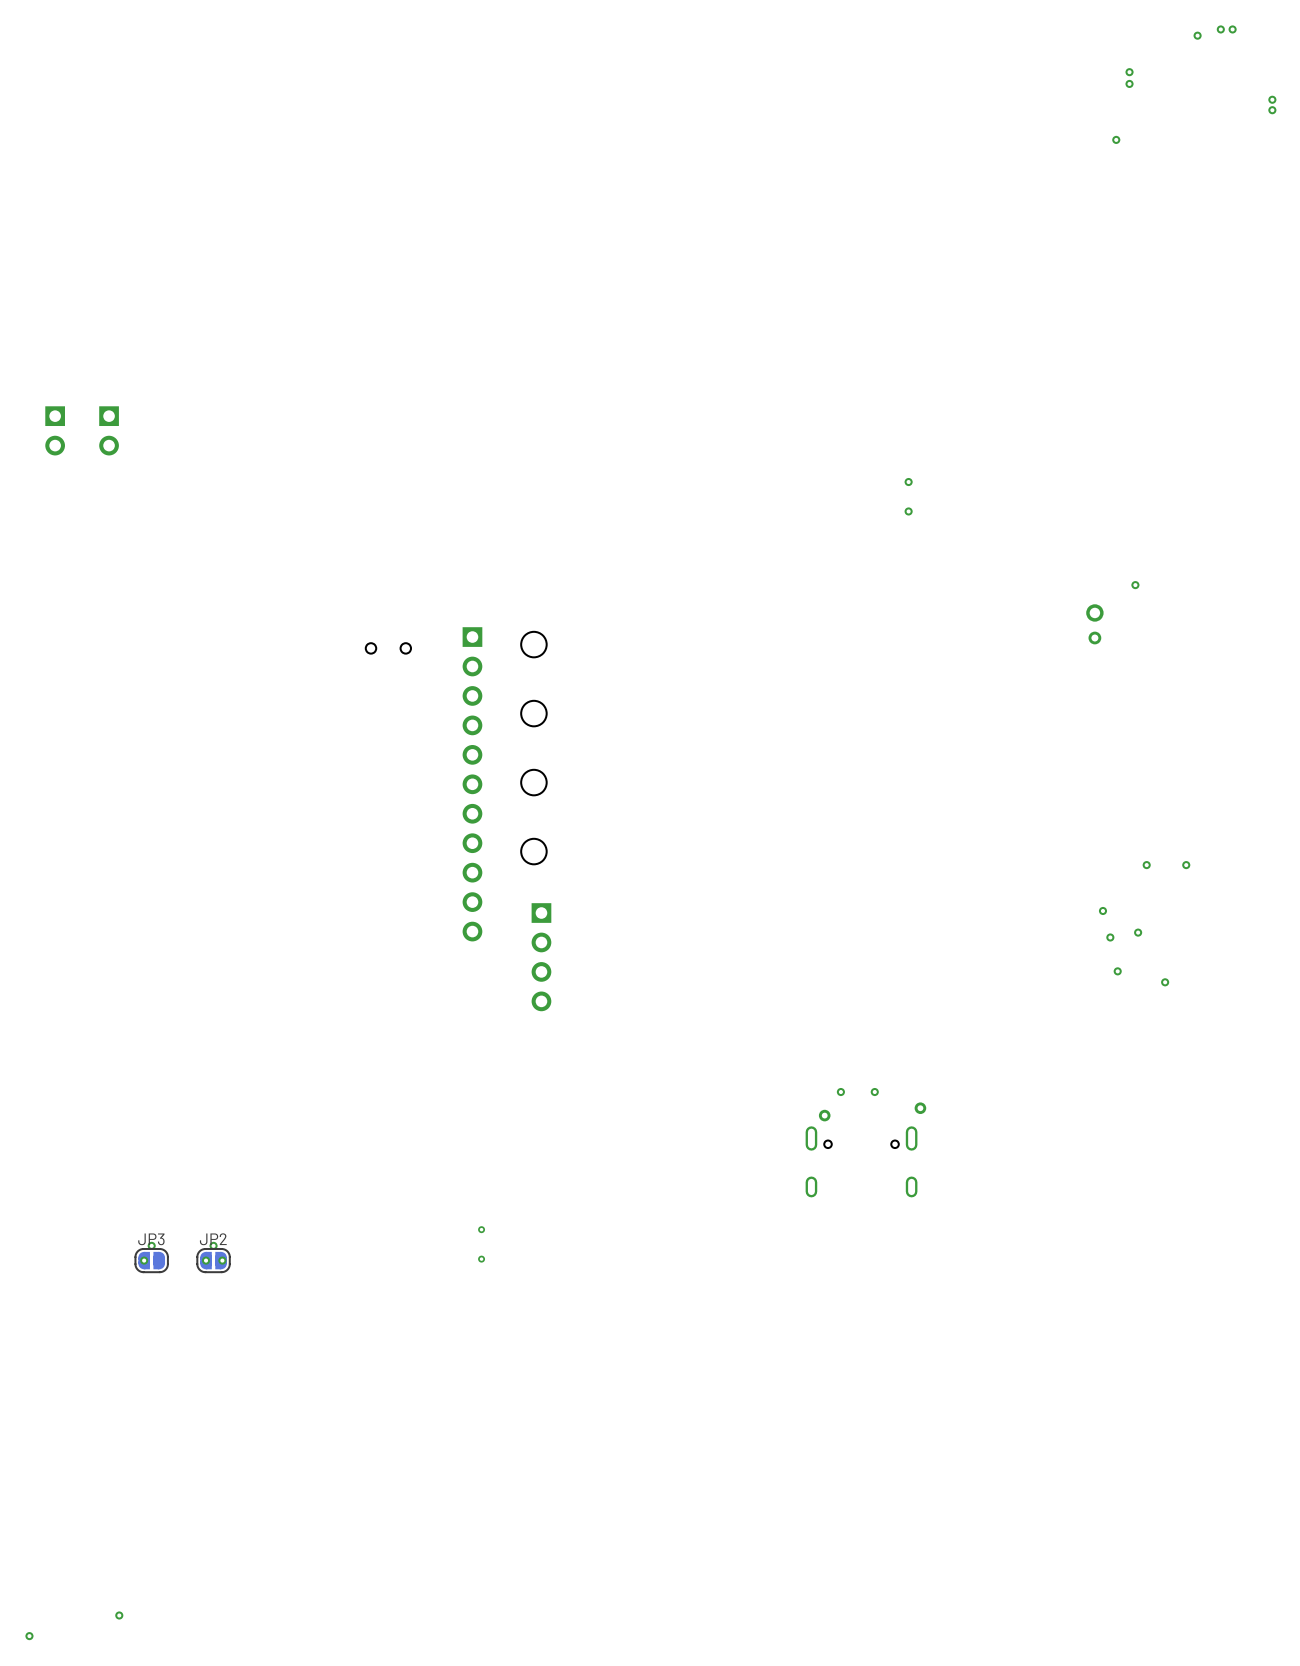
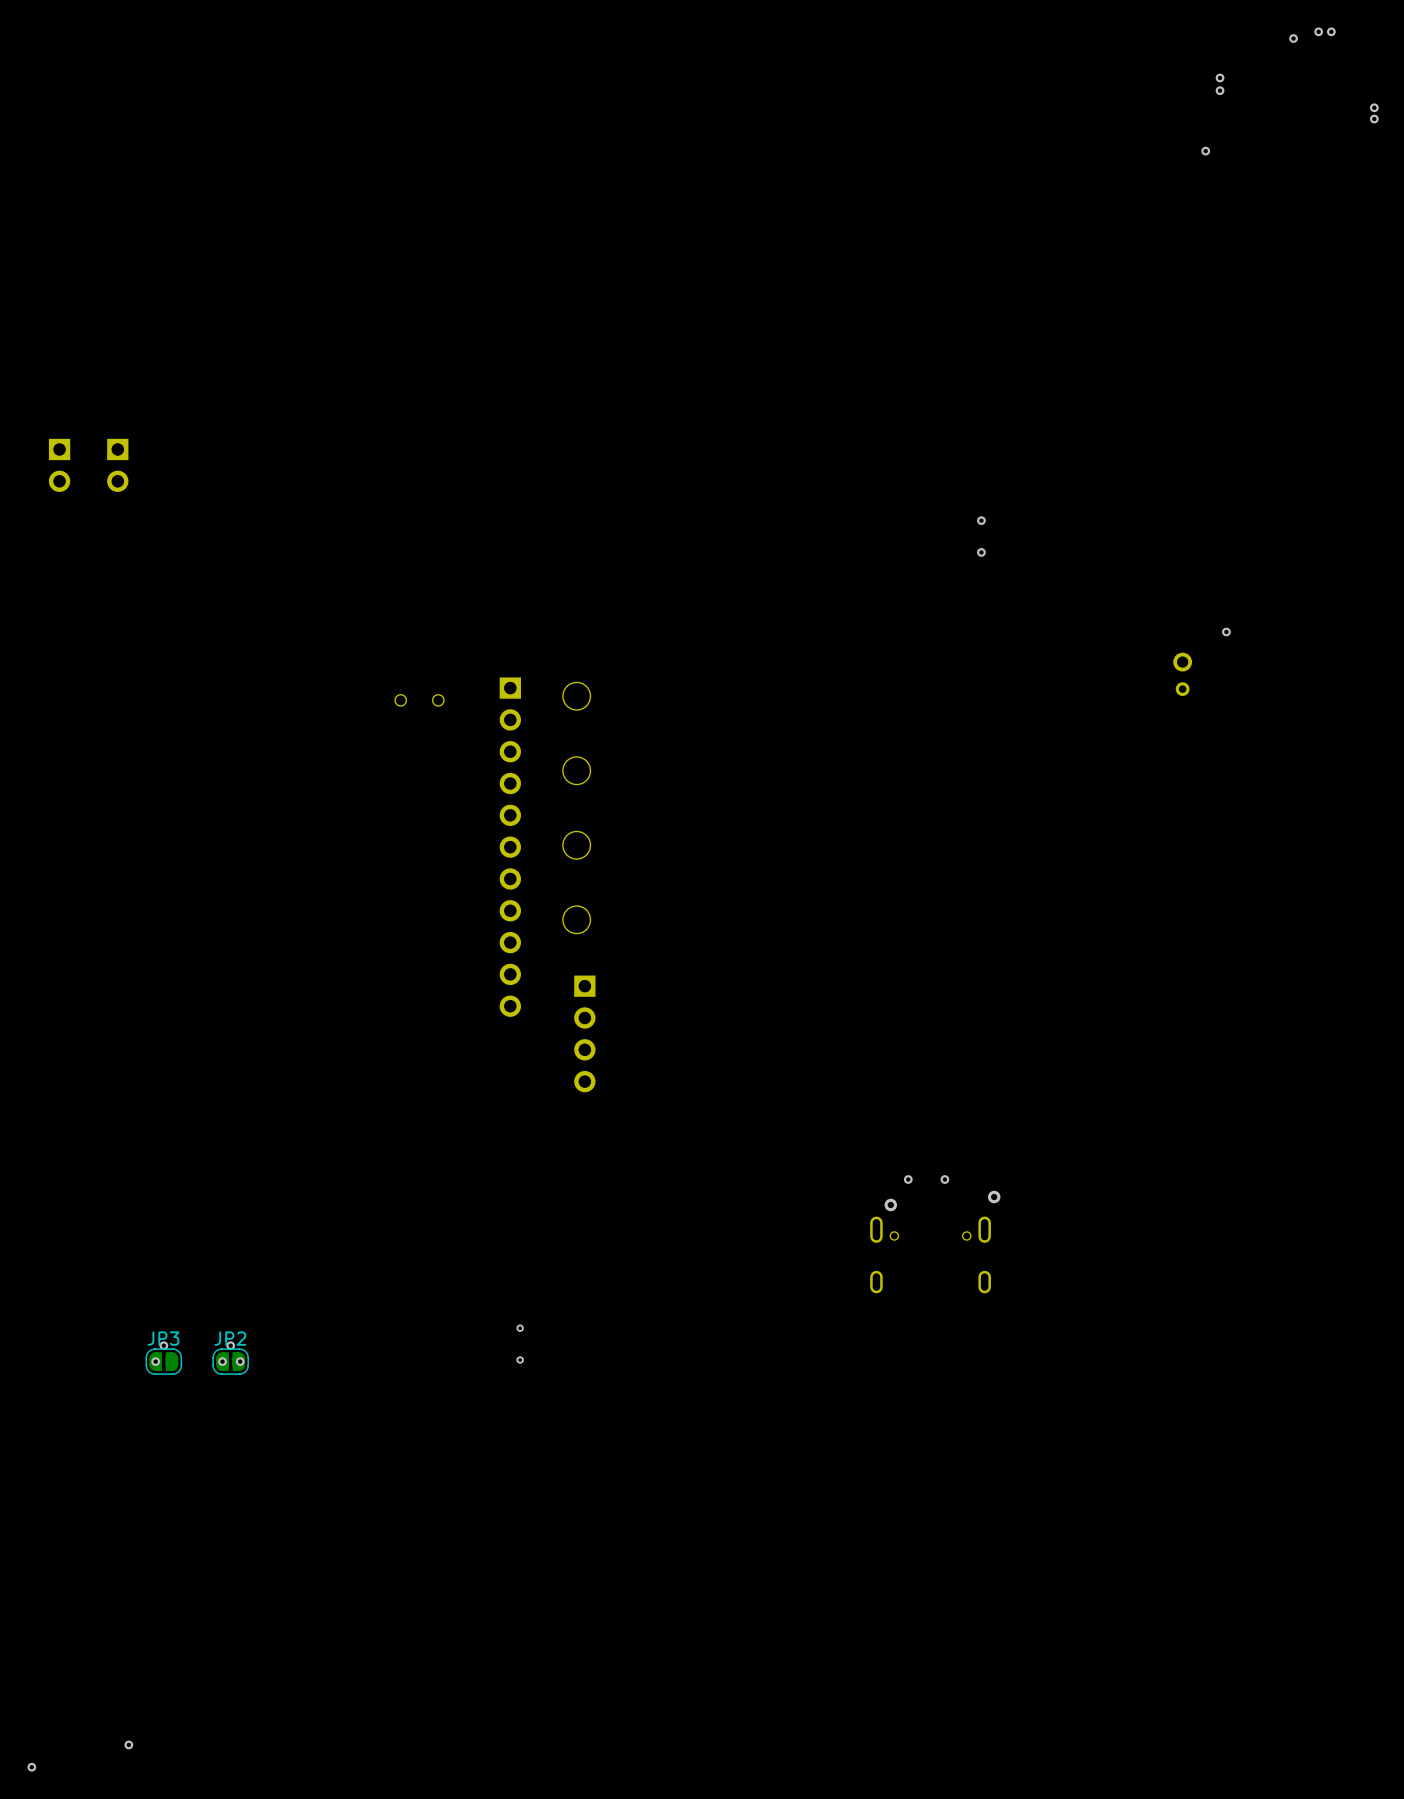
via: (1146, 865) -> none
via: (1186, 865) -> none
via: (1102, 910) -> none
via: (1138, 932) -> none
via: (1110, 937) -> none
via: (1117, 971) -> none
via: (1165, 982) -> none

